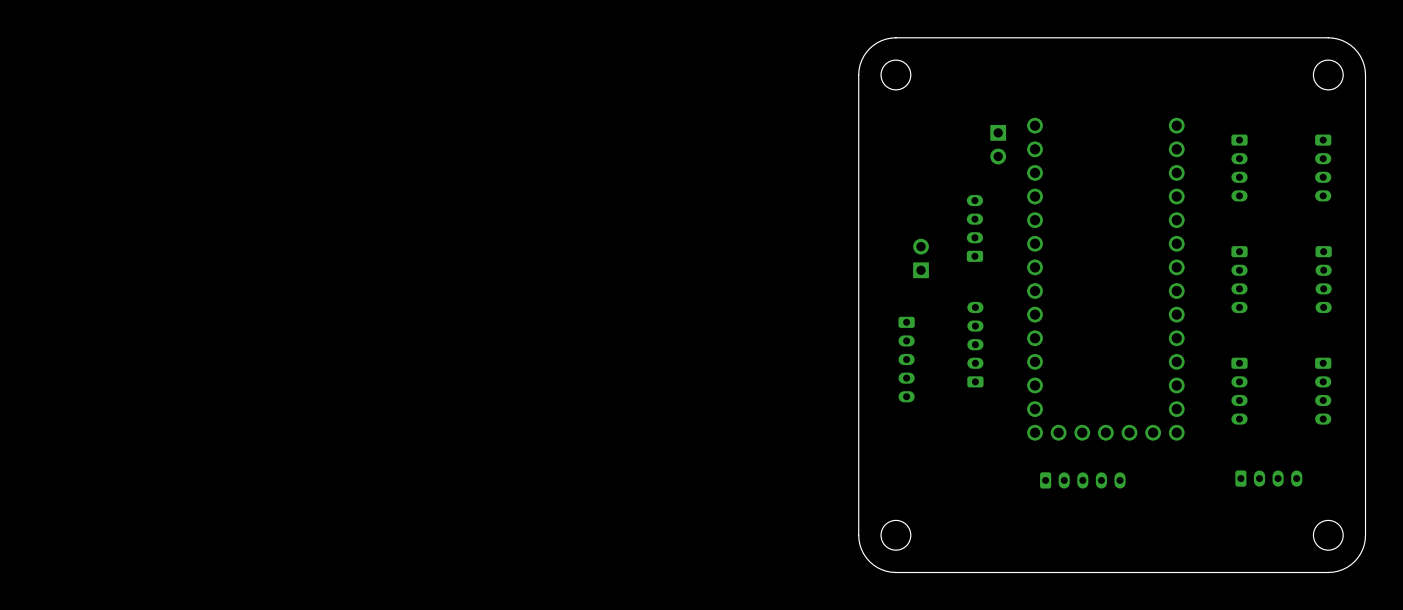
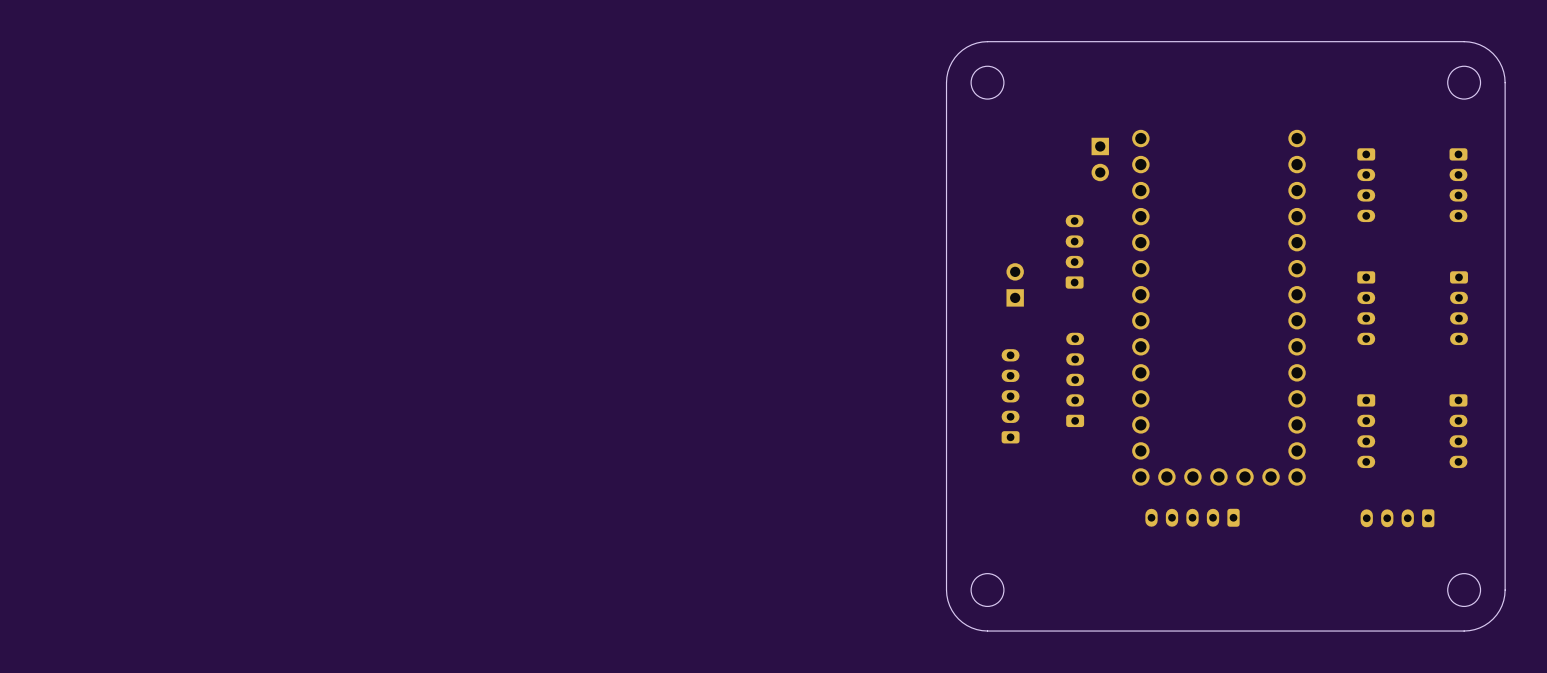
part rotation: 0° (906, 359) -> 180° (1010, 396)
part rotation: 0° (1268, 478) -> 180° (1397, 518)
part rotation: 0° (1082, 480) -> 180° (1192, 517)

